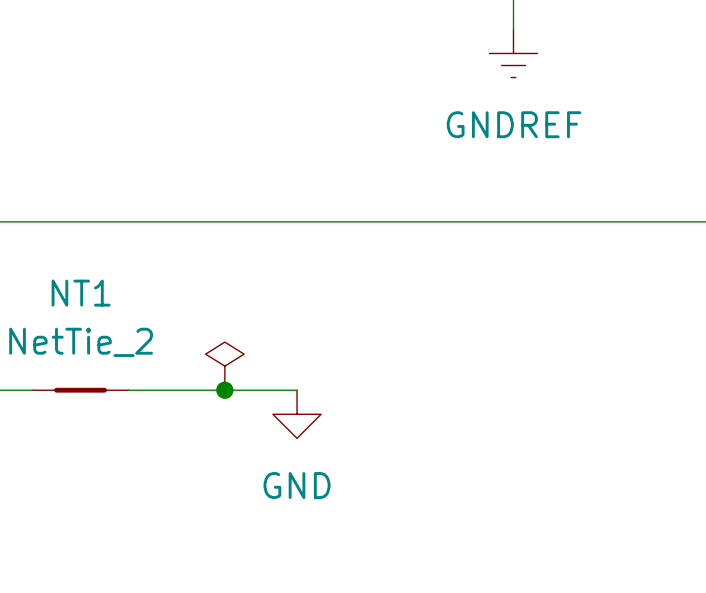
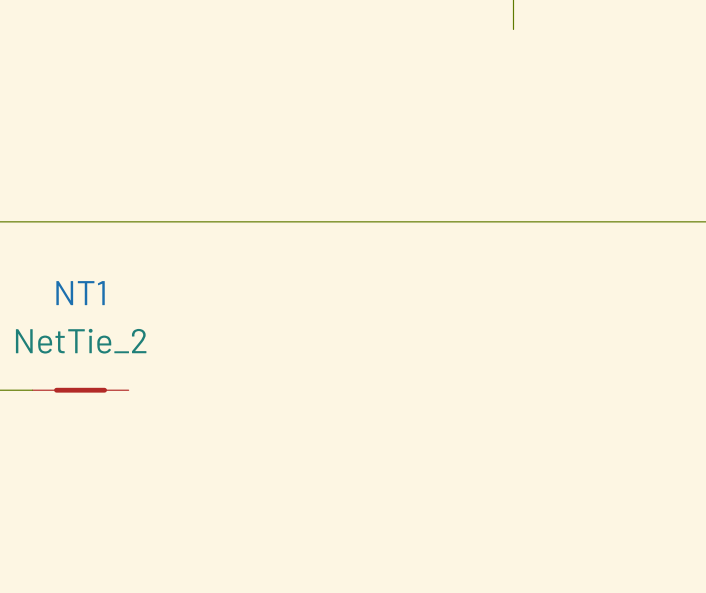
power symbol: GNDREF (513, 53) -> none
power symbol: (224, 366) -> none
wire: (128, 390) (297, 390) -> none
junction: (224, 390) -> none
power symbol: GND (297, 414) -> none

